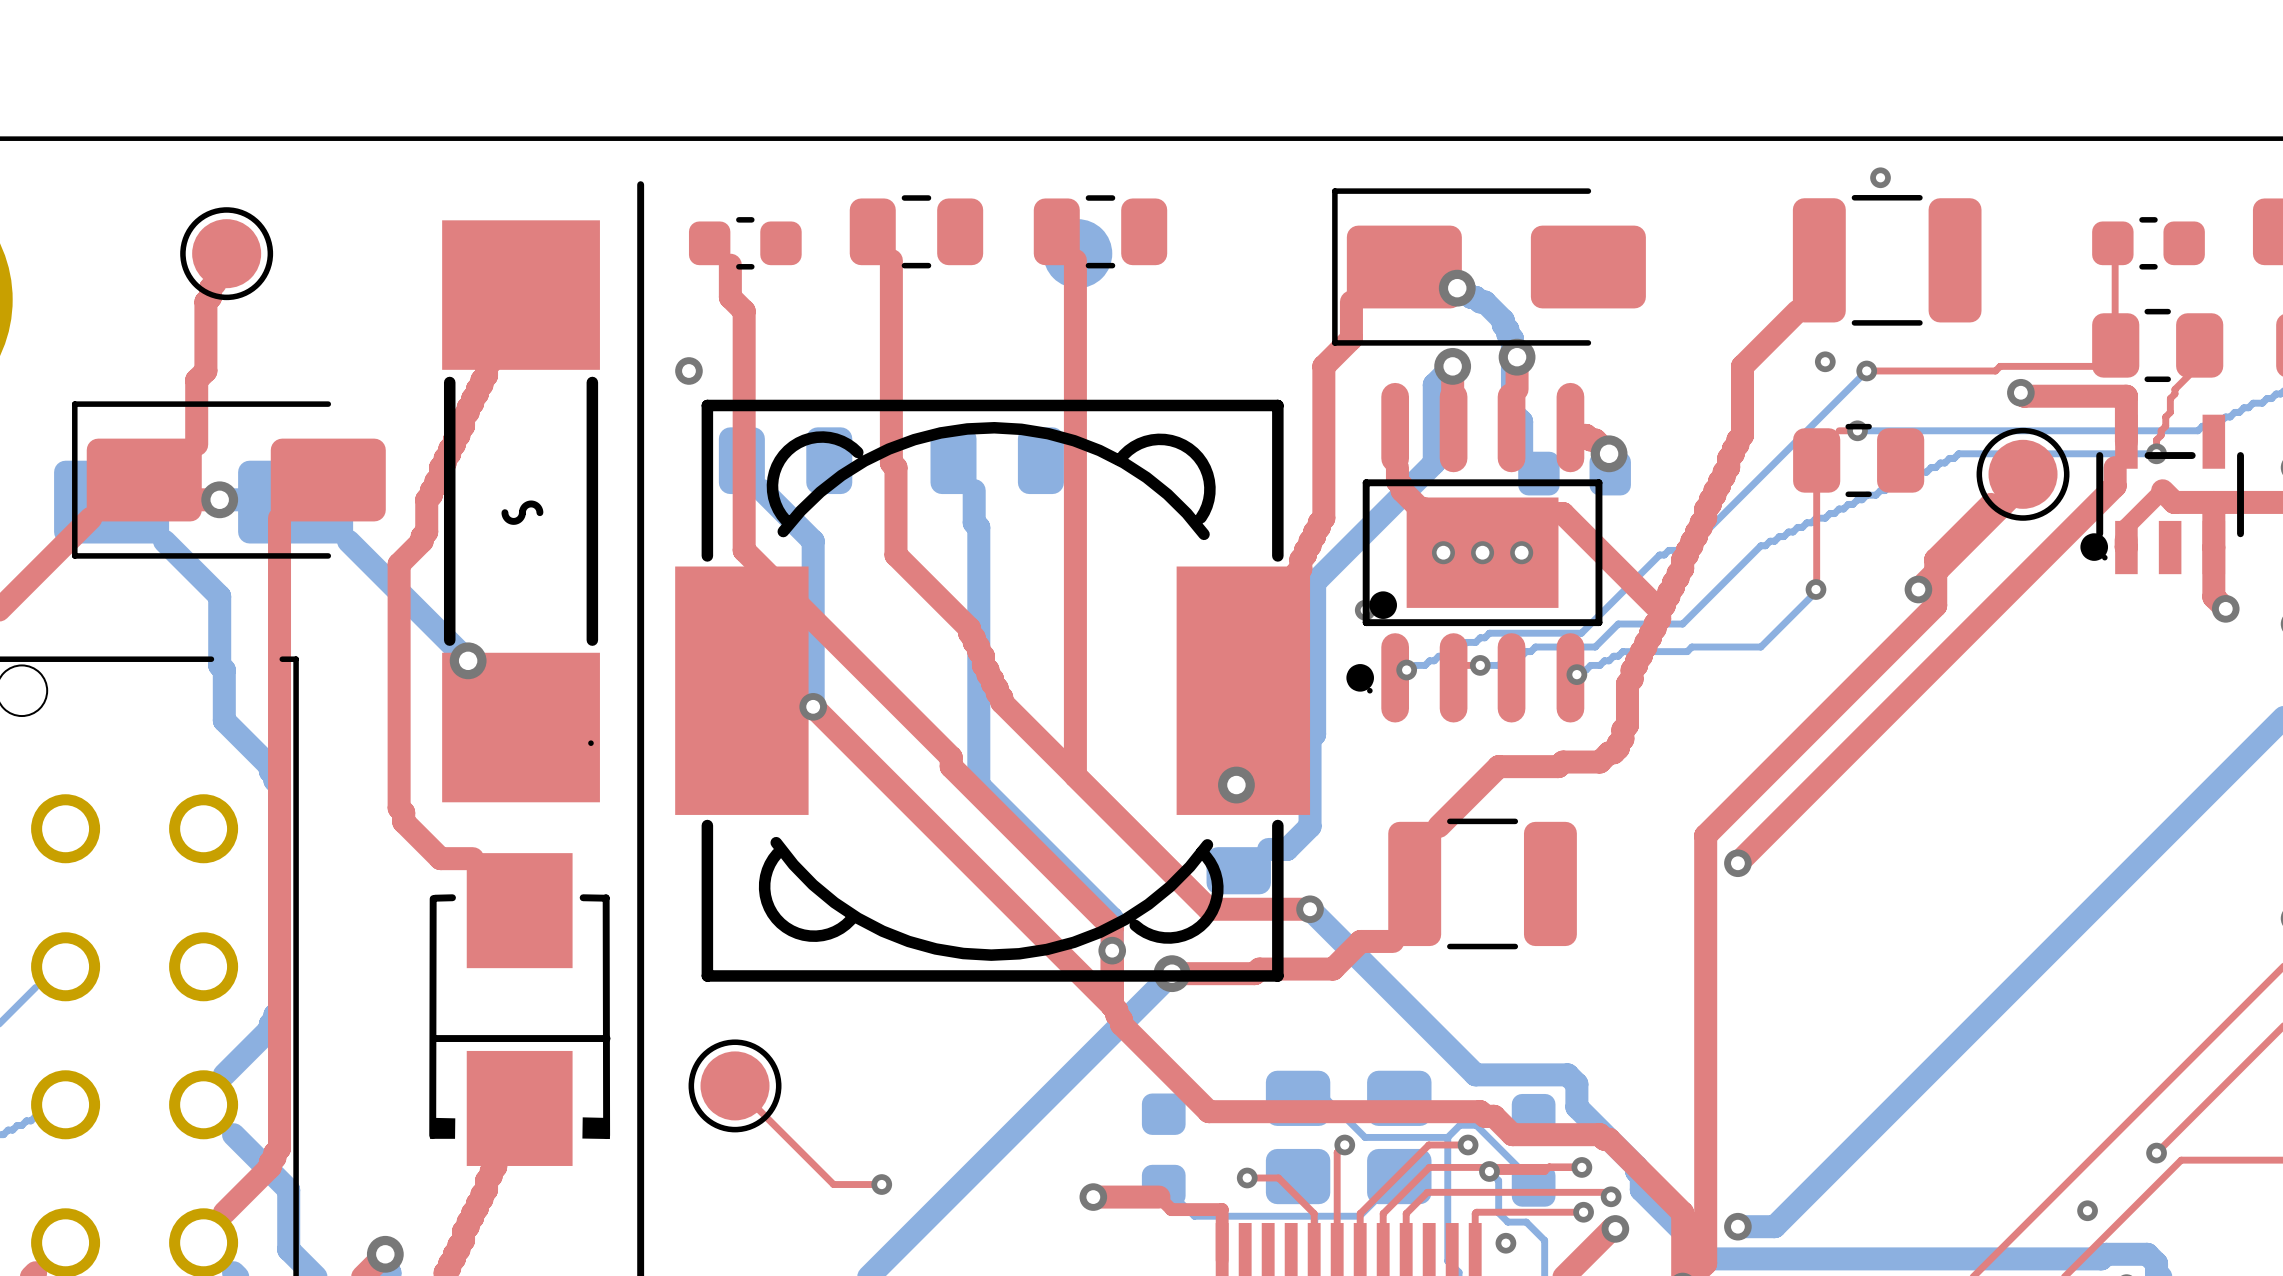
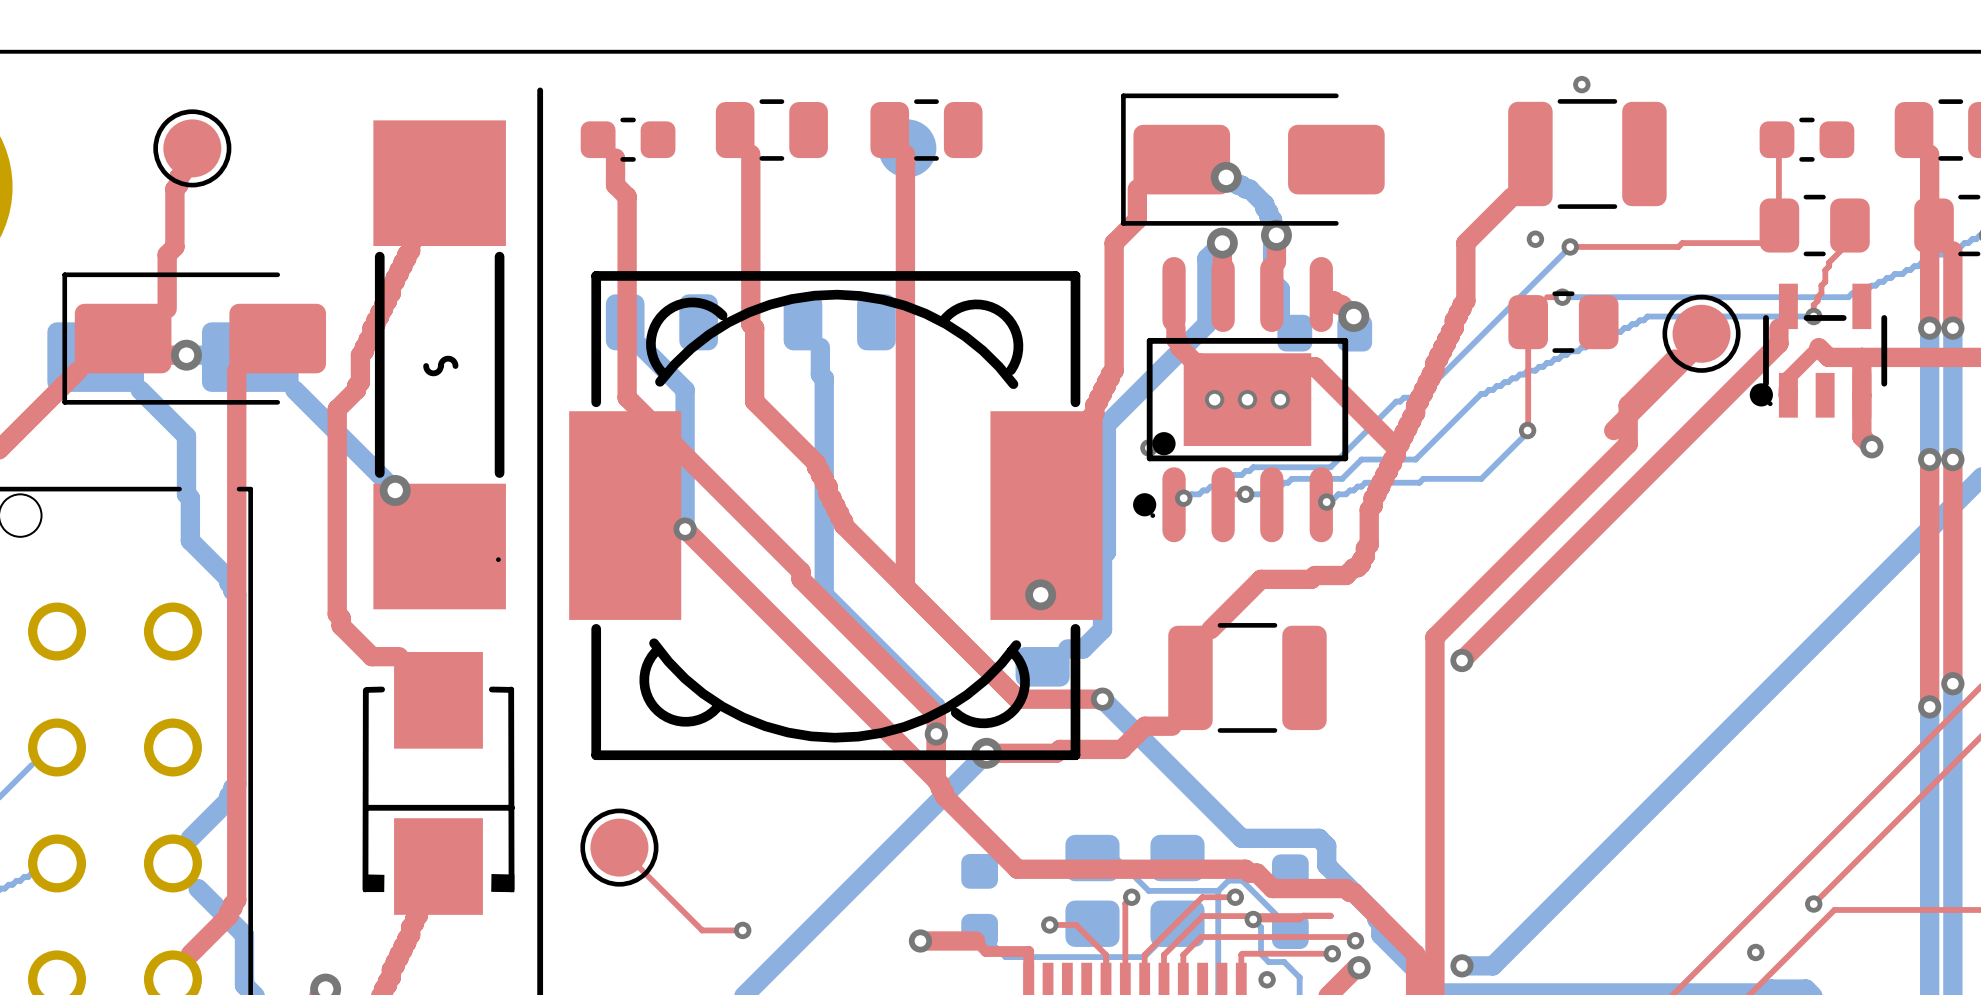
via: (688, 370) -> none
top track: (2020, 392) (2024, 396) (2126, 396) (2126, 441) -> none
via: (2020, 392) -> none
via: (1918, 589) -> none
via: (1581, 1167) -> none

